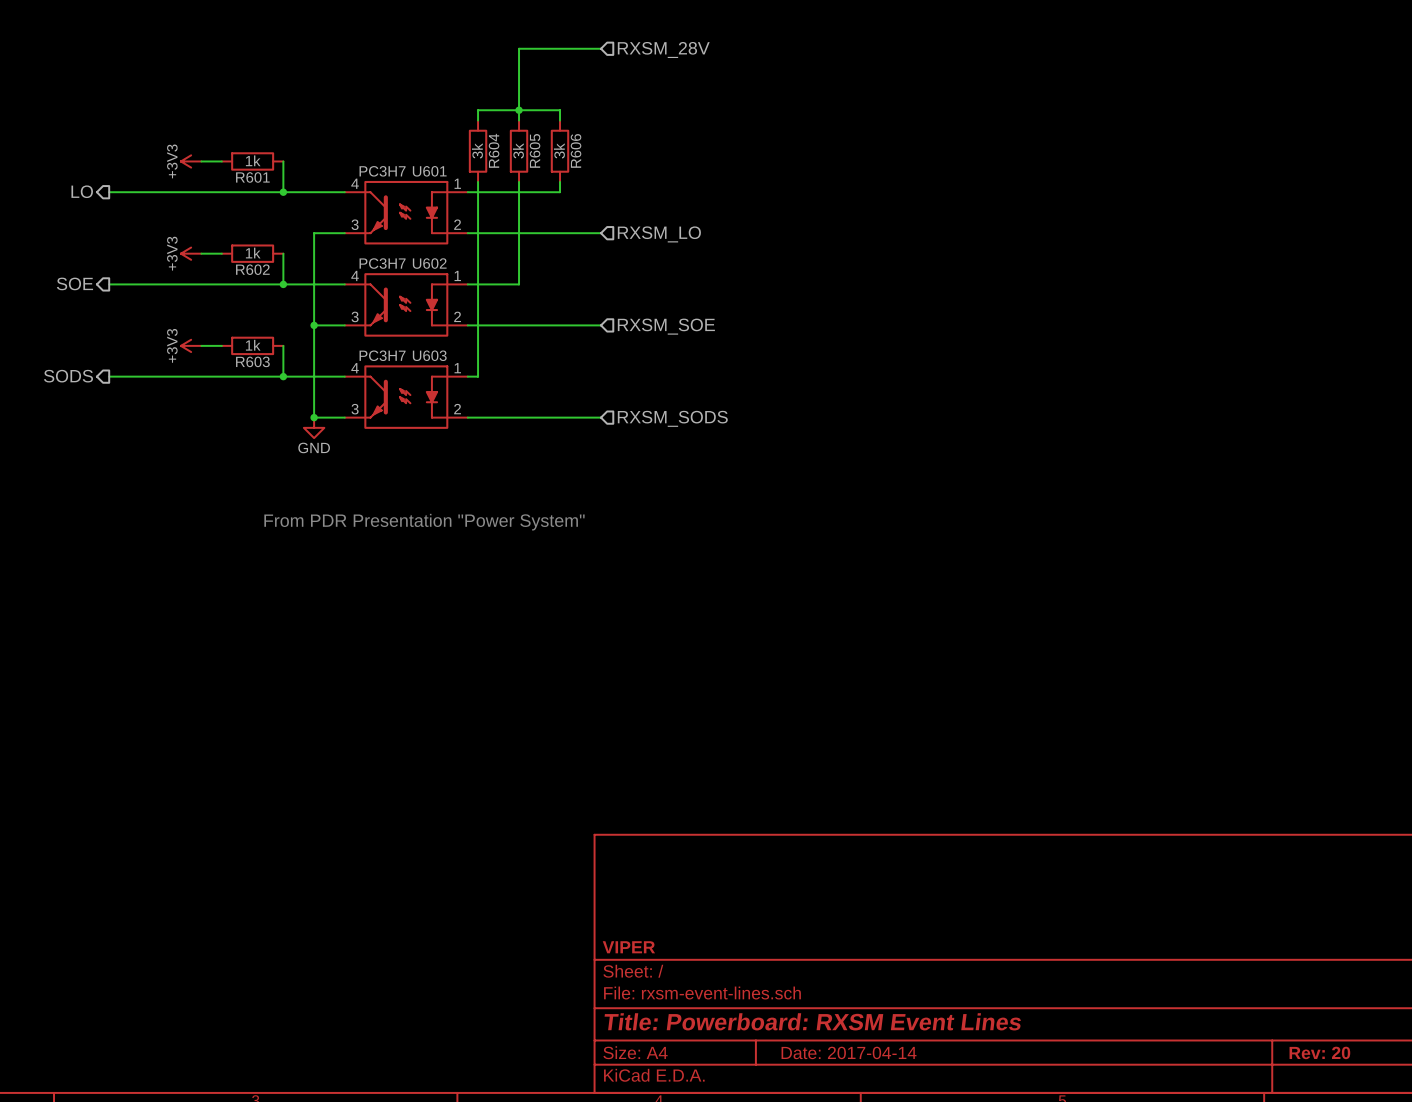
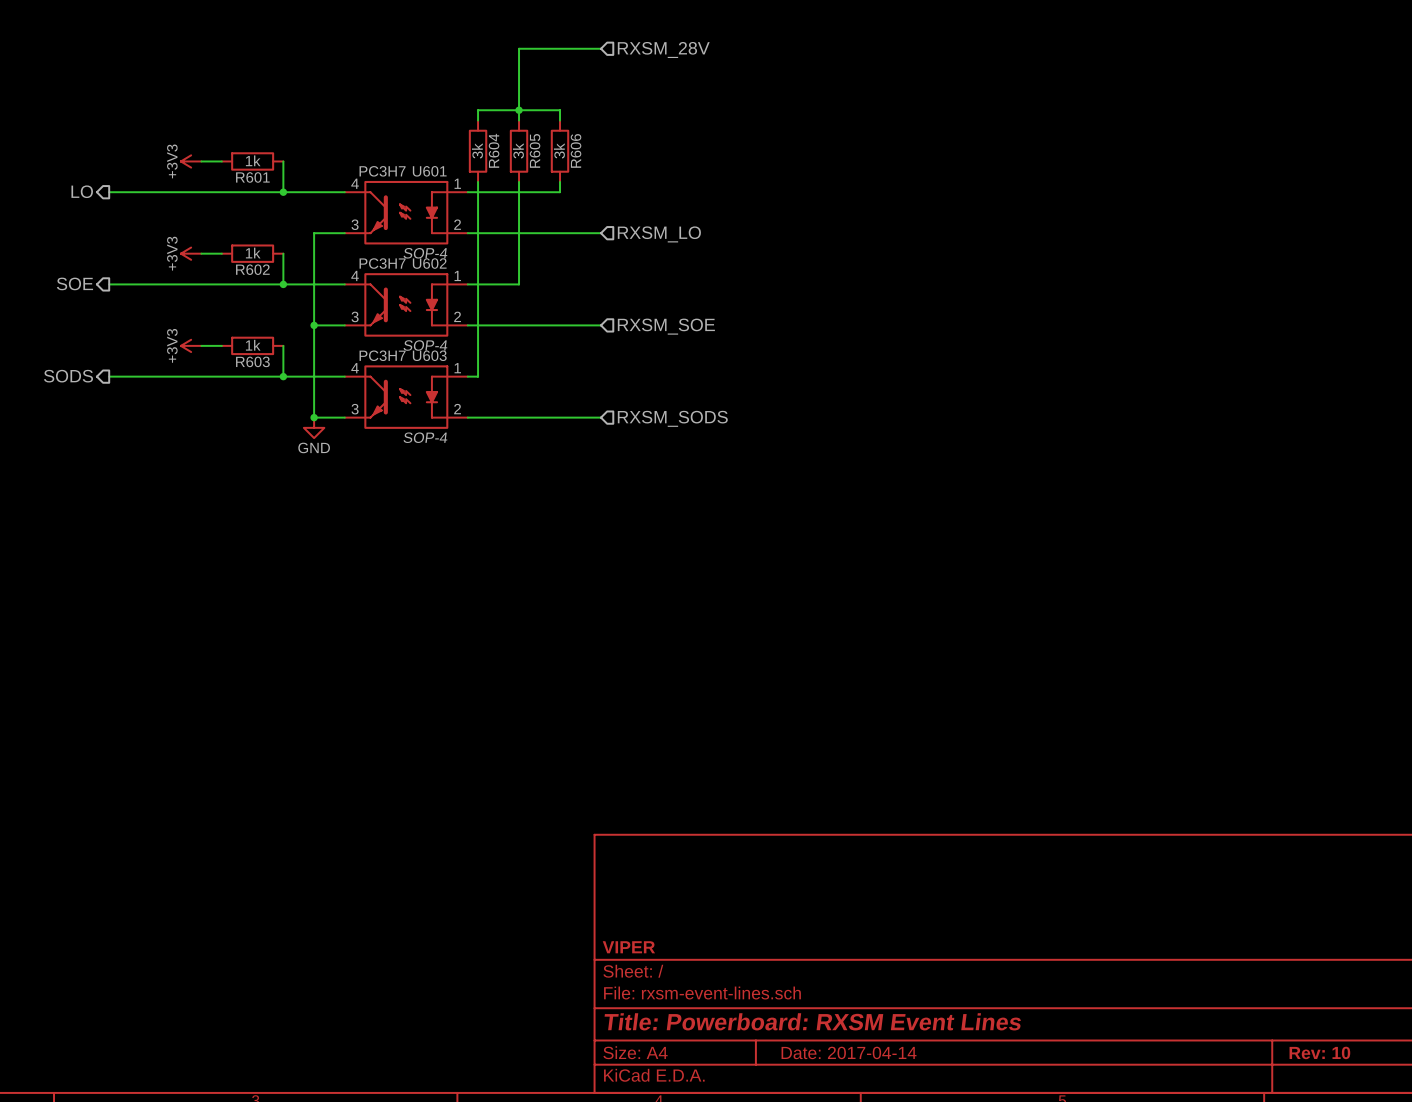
U601 text: none -> SOP-4 (425, 253)
U602 text: none -> SOP-4 (425, 345)
U603 text: none -> SOP-4 (425, 437)
text: From PDR Presentation "Power System" (424, 522) -> none
title block: Rev: 20 (1319, 1052) -> Rev: 10 (1319, 1052)

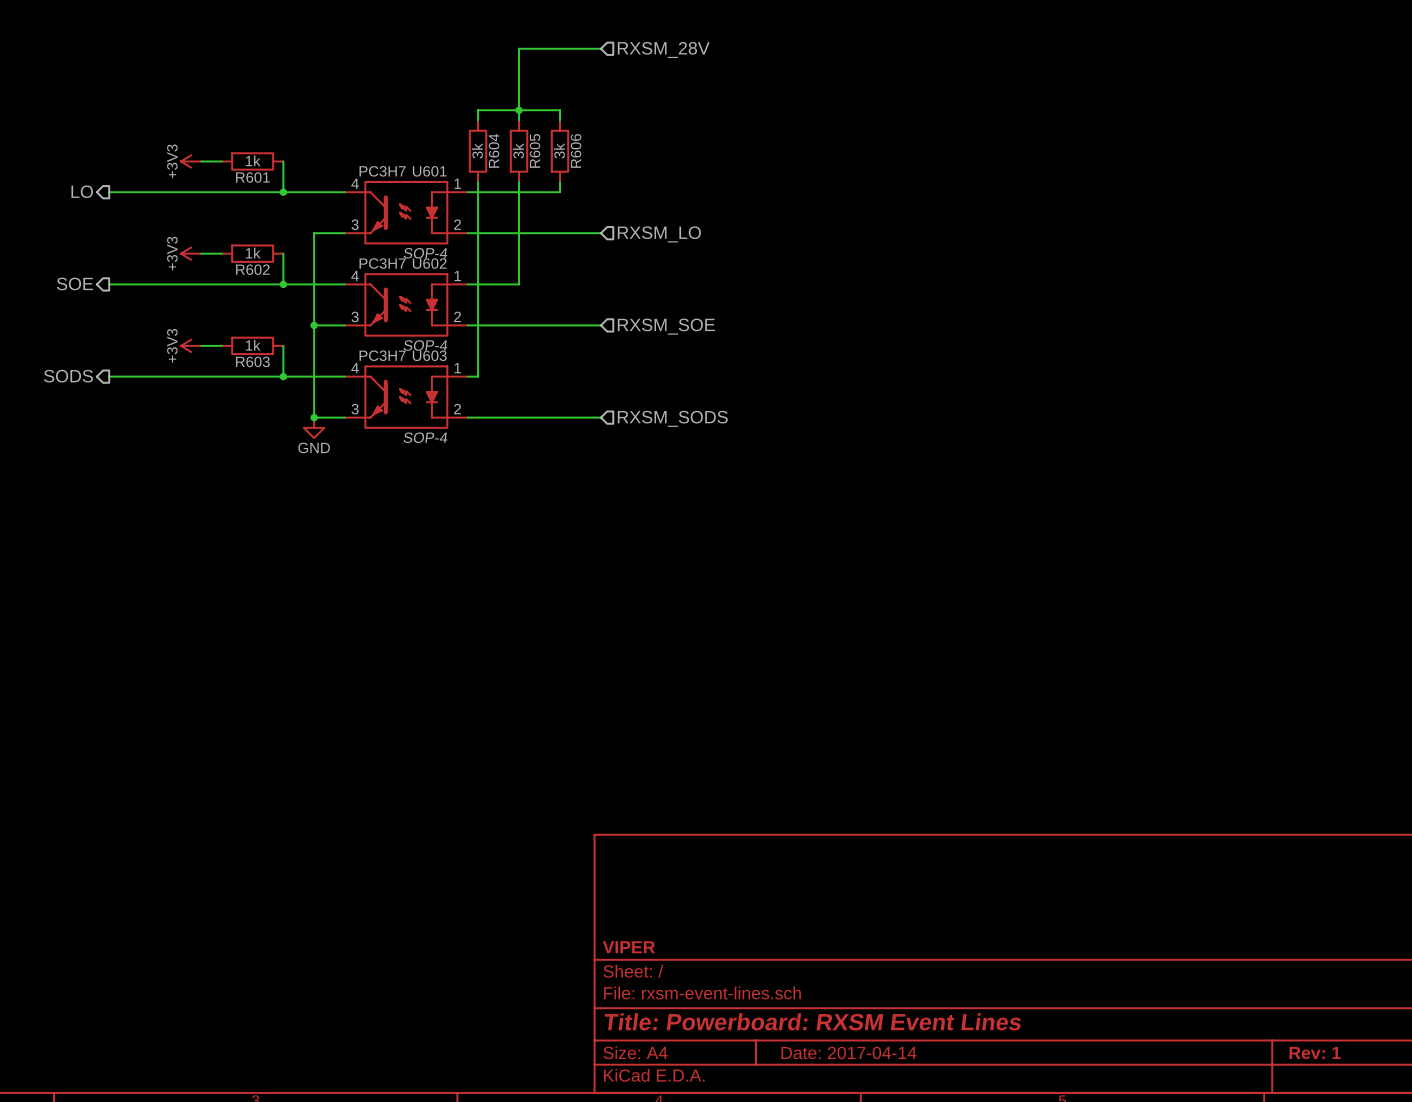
title block: Rev: 10 (1319, 1052) -> Rev: 1 (1315, 1053)

